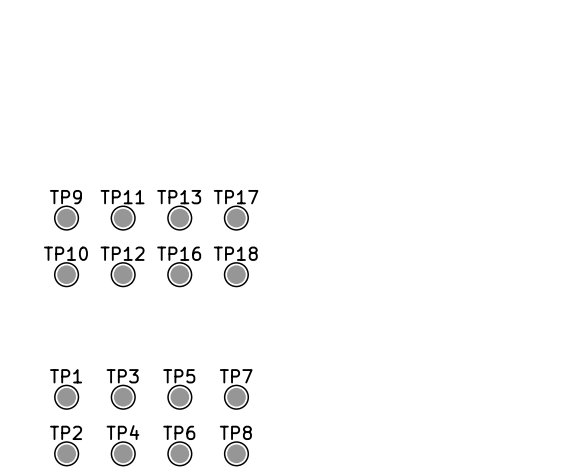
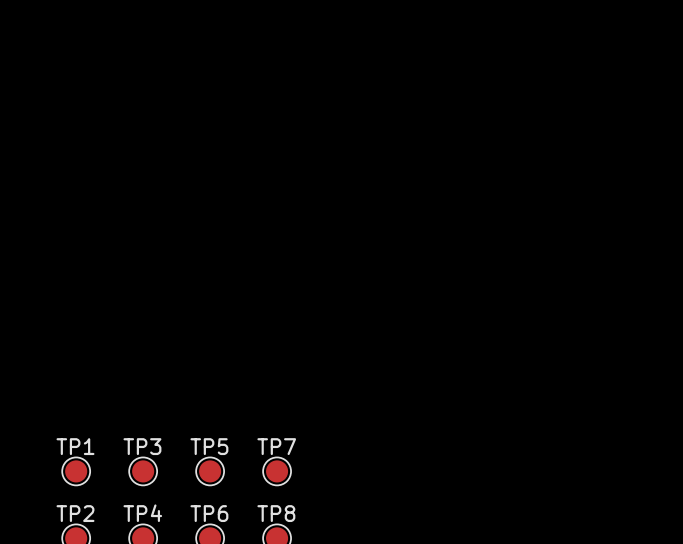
TP9: (66, 218) -> none
TP11: (123, 218) -> none
TP13: (179, 218) -> none
TP17: (236, 218) -> none
TP10: (66, 274) -> none
TP12: (123, 274) -> none
TP16: (179, 274) -> none
TP18: (236, 274) -> none

